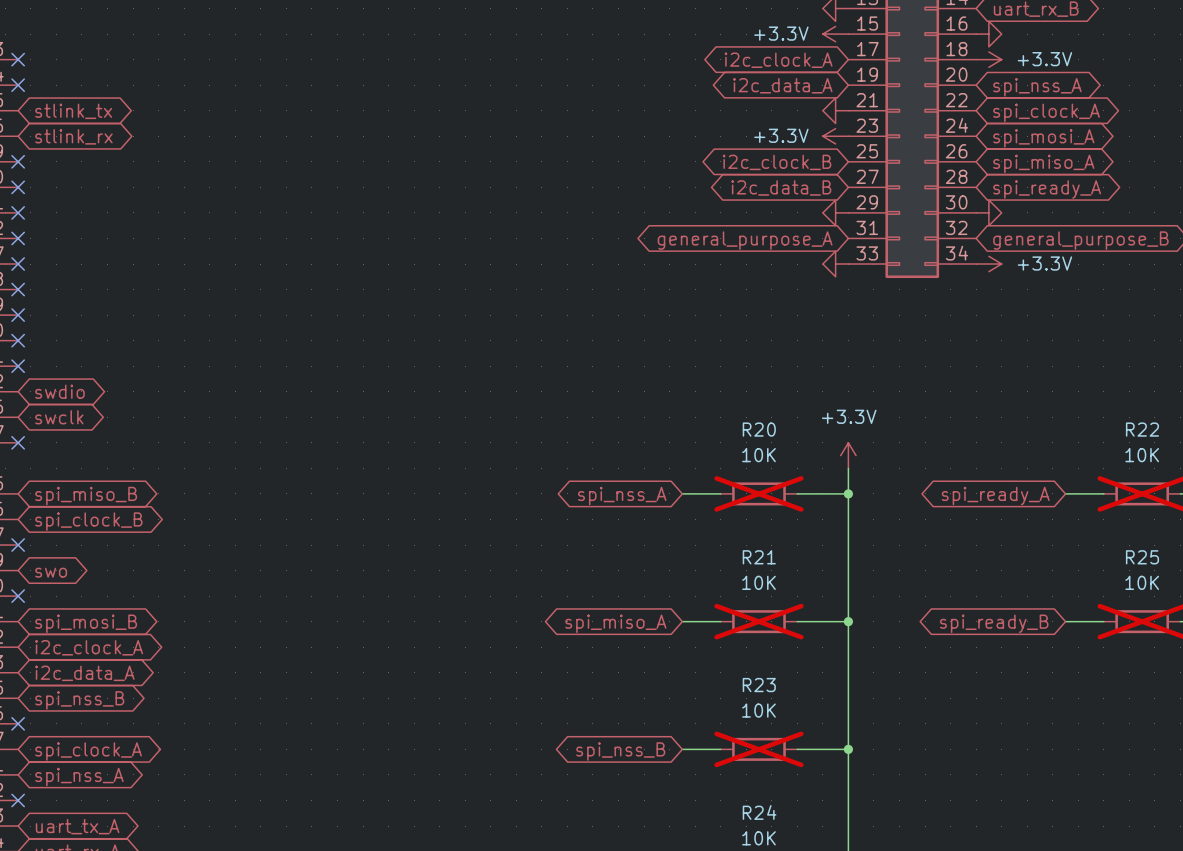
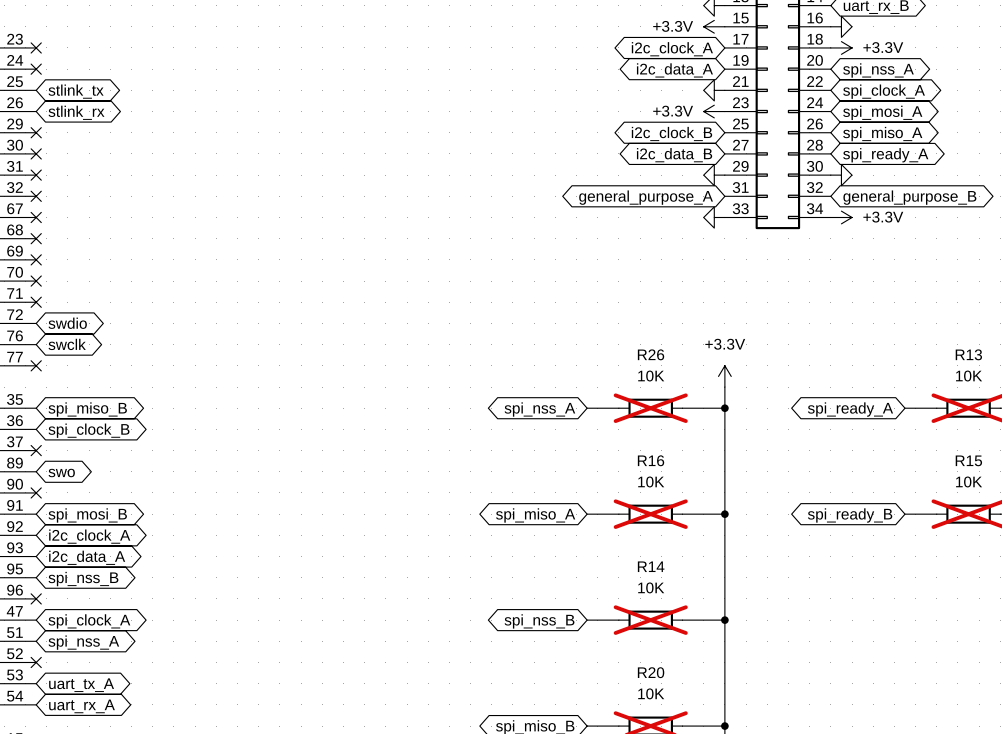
R20 name: R20 (759, 429) -> R26 (651, 354)
R22 name: R22 (1142, 429) -> R13 (968, 354)
R21 name: R21 (759, 557) -> R16 (651, 460)
R25 name: R25 (1142, 557) -> R15 (968, 460)
R23 name: R23 (759, 685) -> R14 (651, 566)
R24 name: R24 (759, 812) -> R20 (651, 672)

